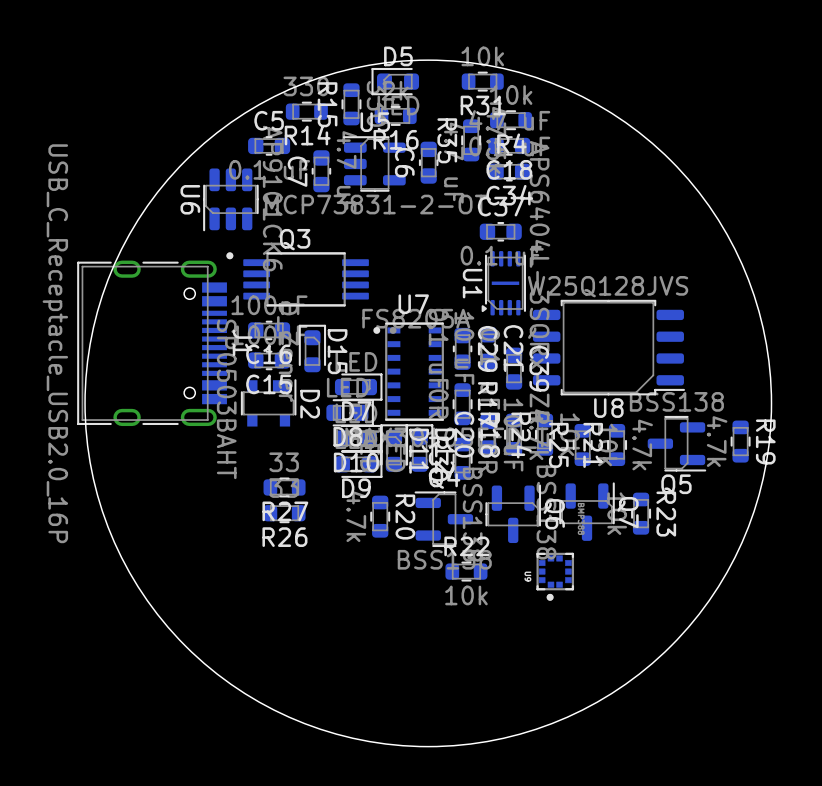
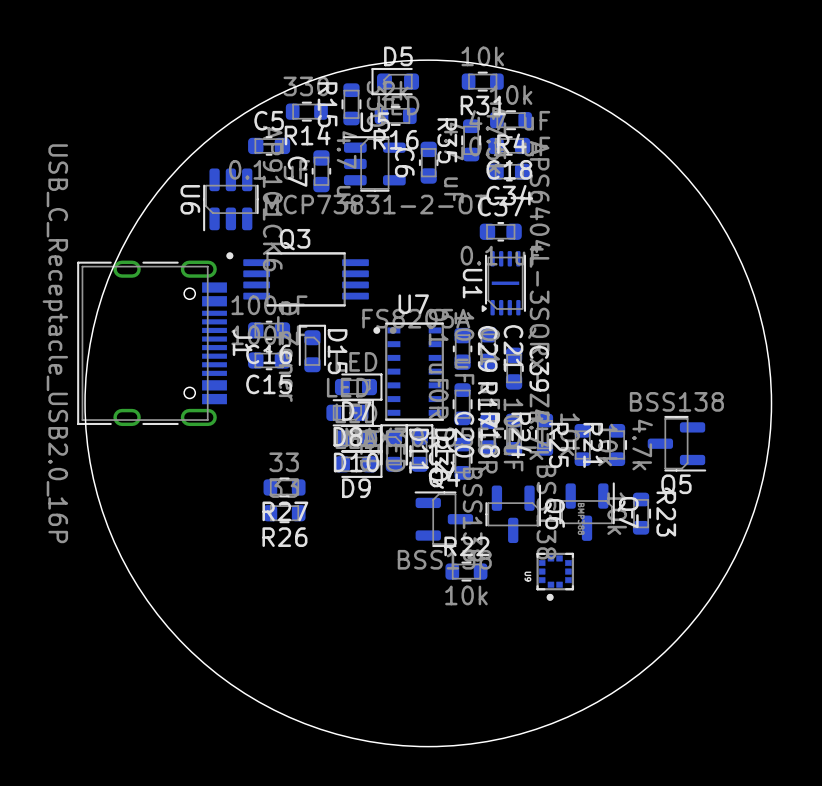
U8: W25Q128JVS (608, 347) -> none
D2: SP0503BAHT (268, 402) -> none
R19: 4.7k (740, 441) -> none
R20: 4.7k (380, 516) -> none

